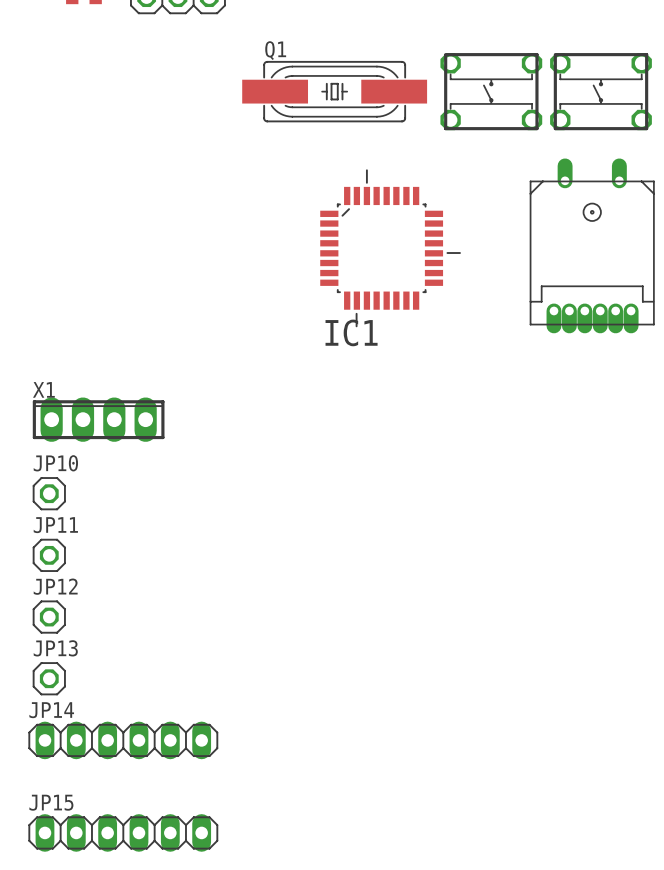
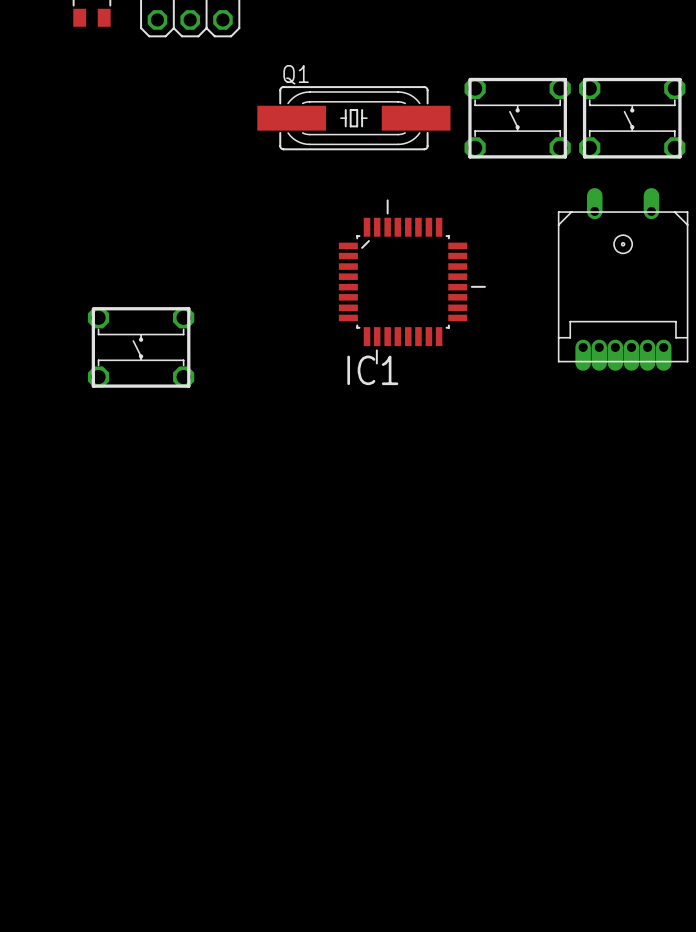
part: none -> (141, 347)
X1: (98, 419) -> none
JP10: (49, 493) -> none
JP11: (49, 555) -> none
JP12: (49, 617) -> none
JP13: (49, 678) -> none
JP14: (123, 740) -> none
JP15: (123, 832) -> none

